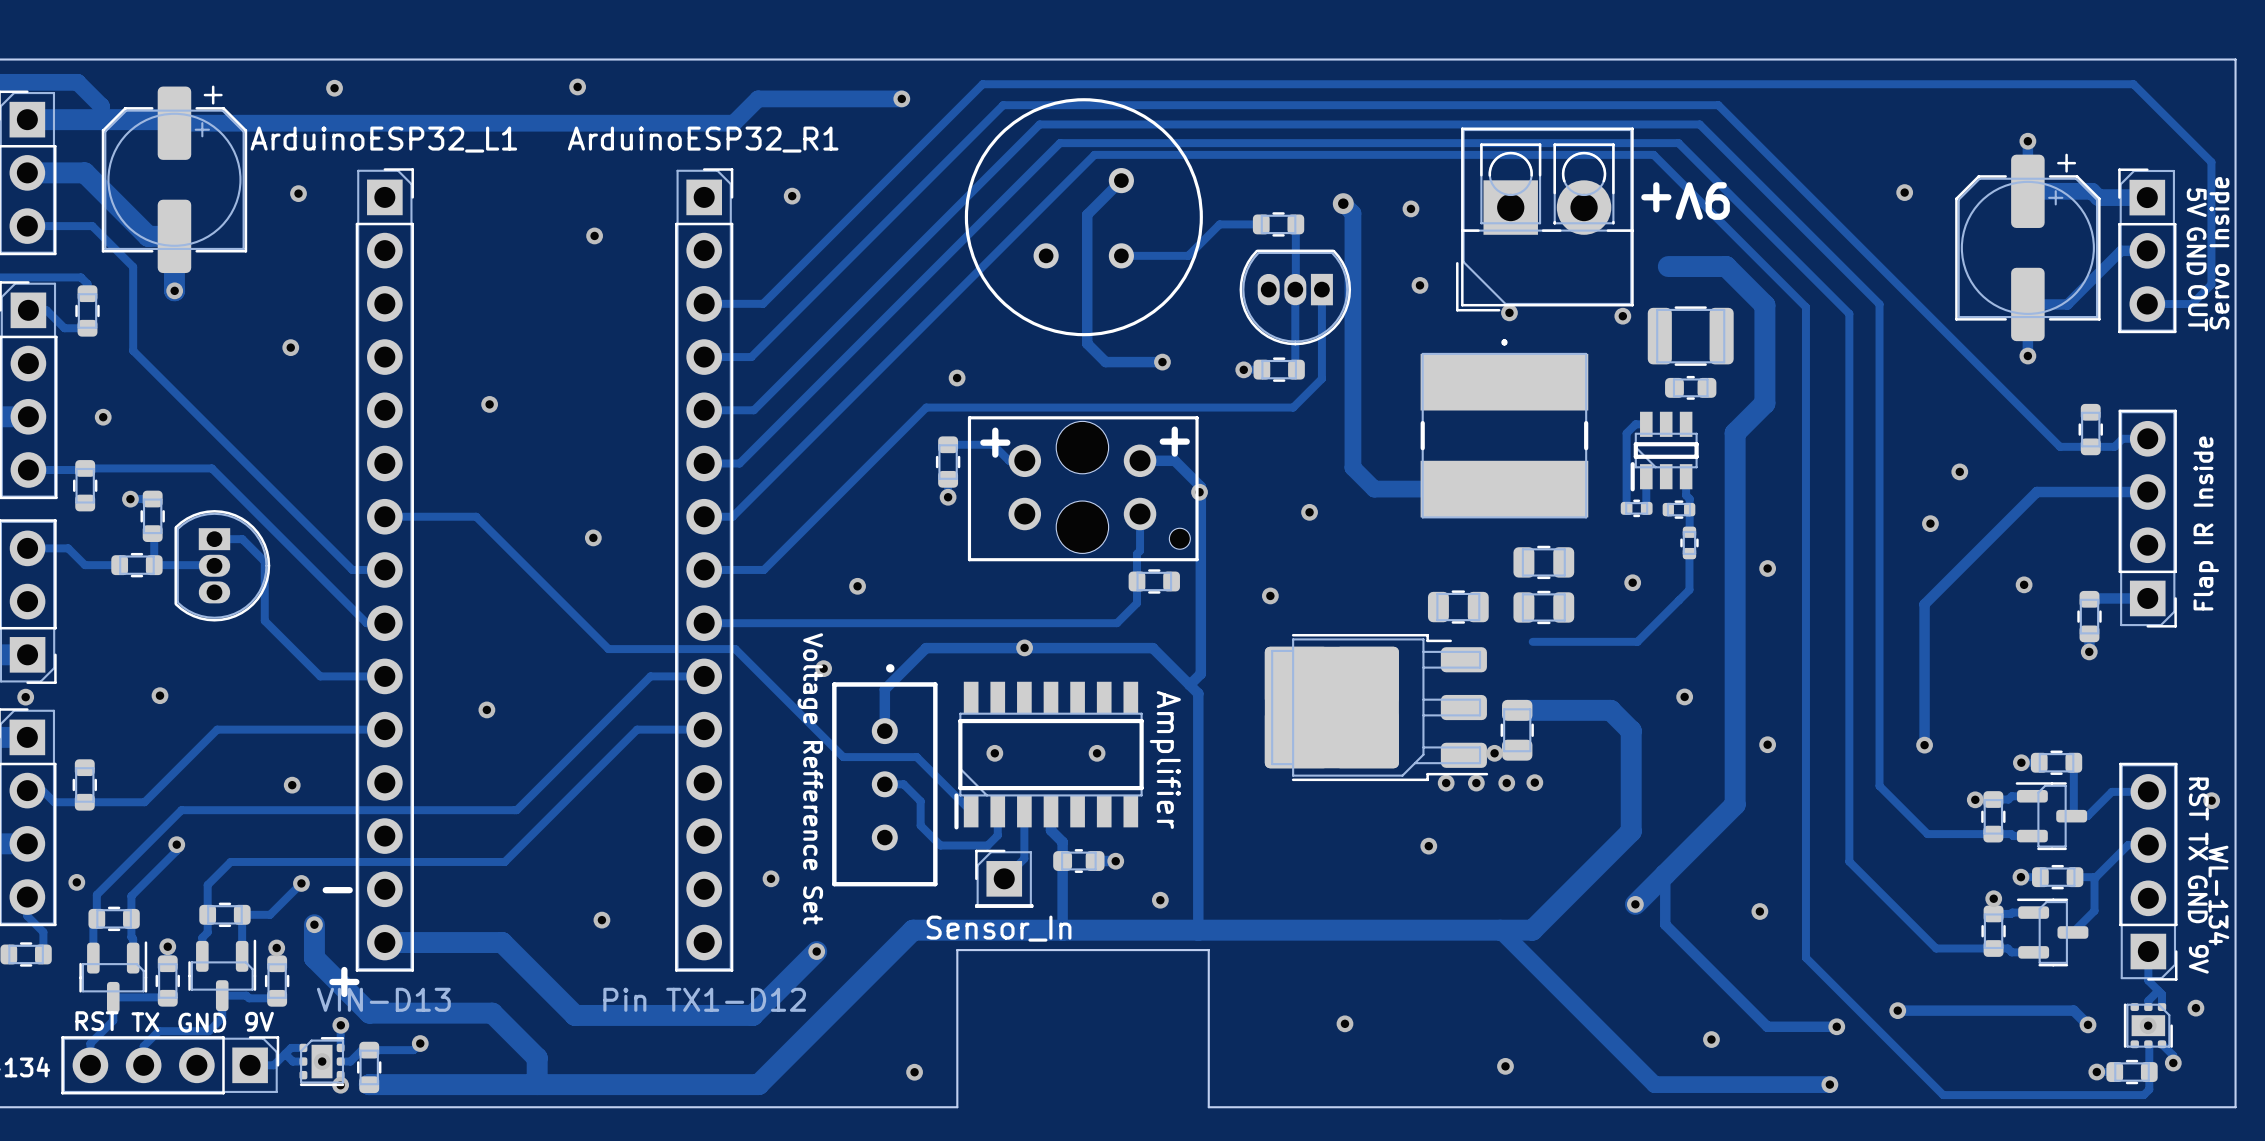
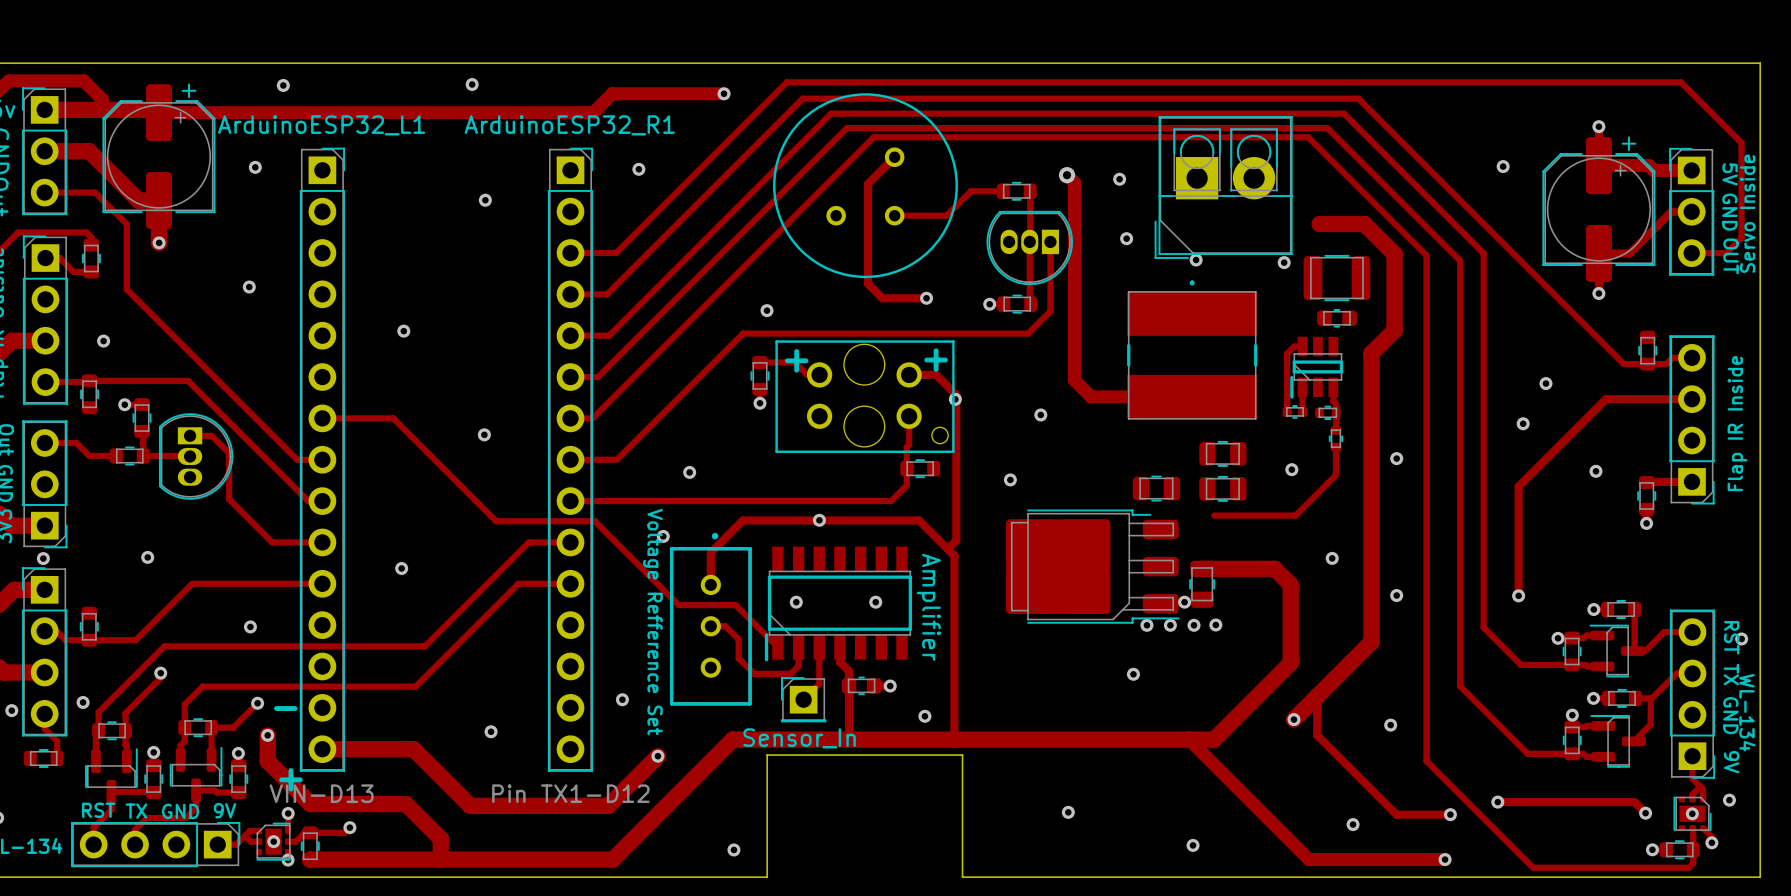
text: 9V+ (1685, 201) -> none

